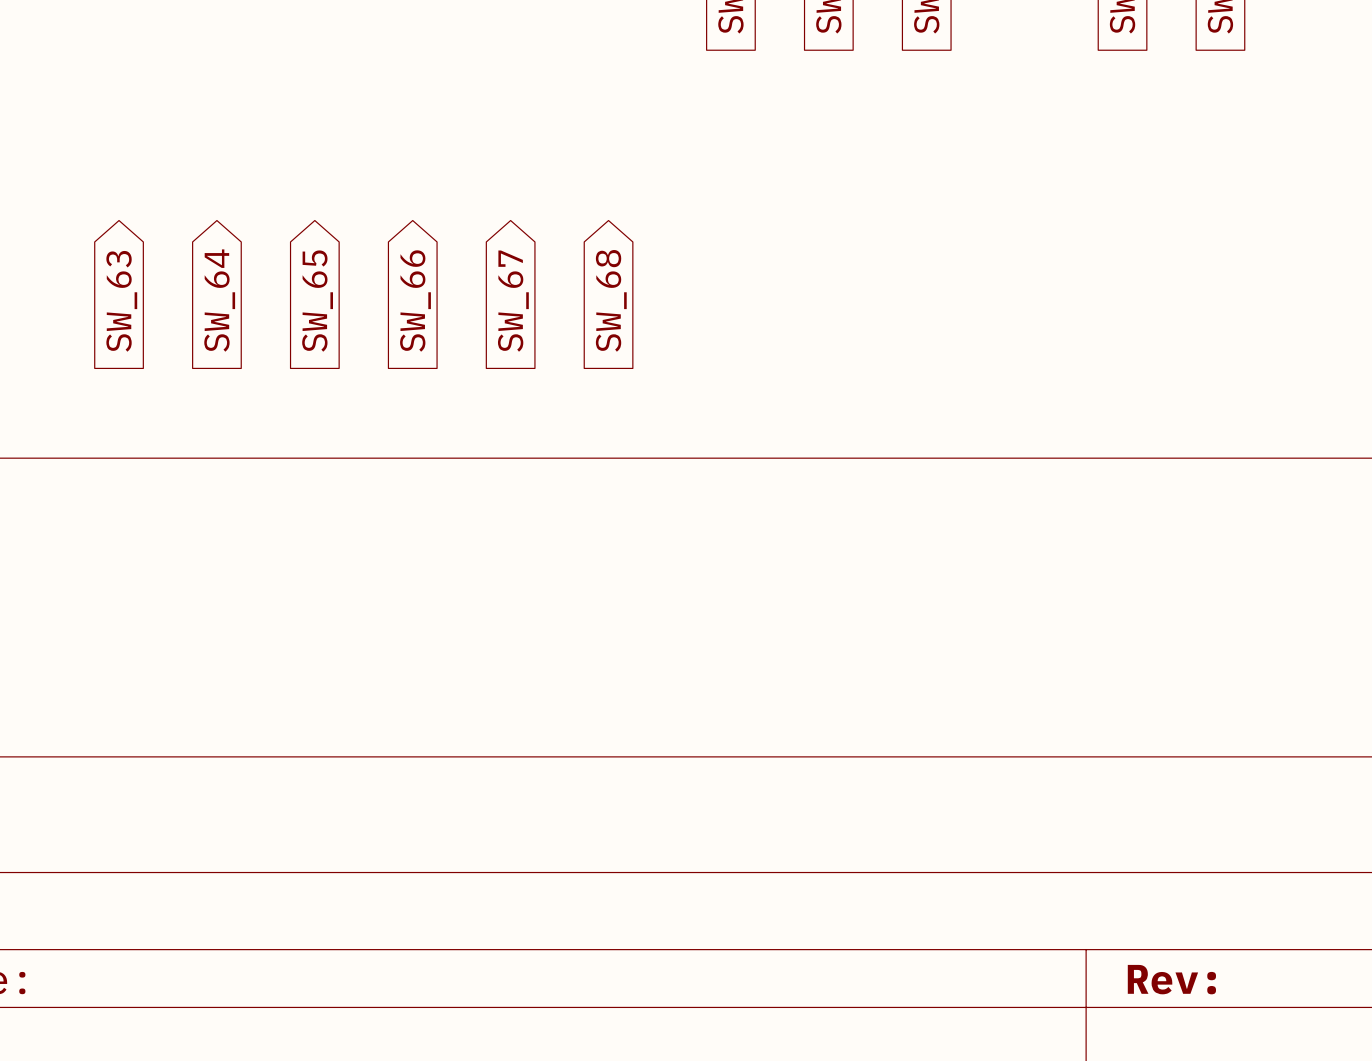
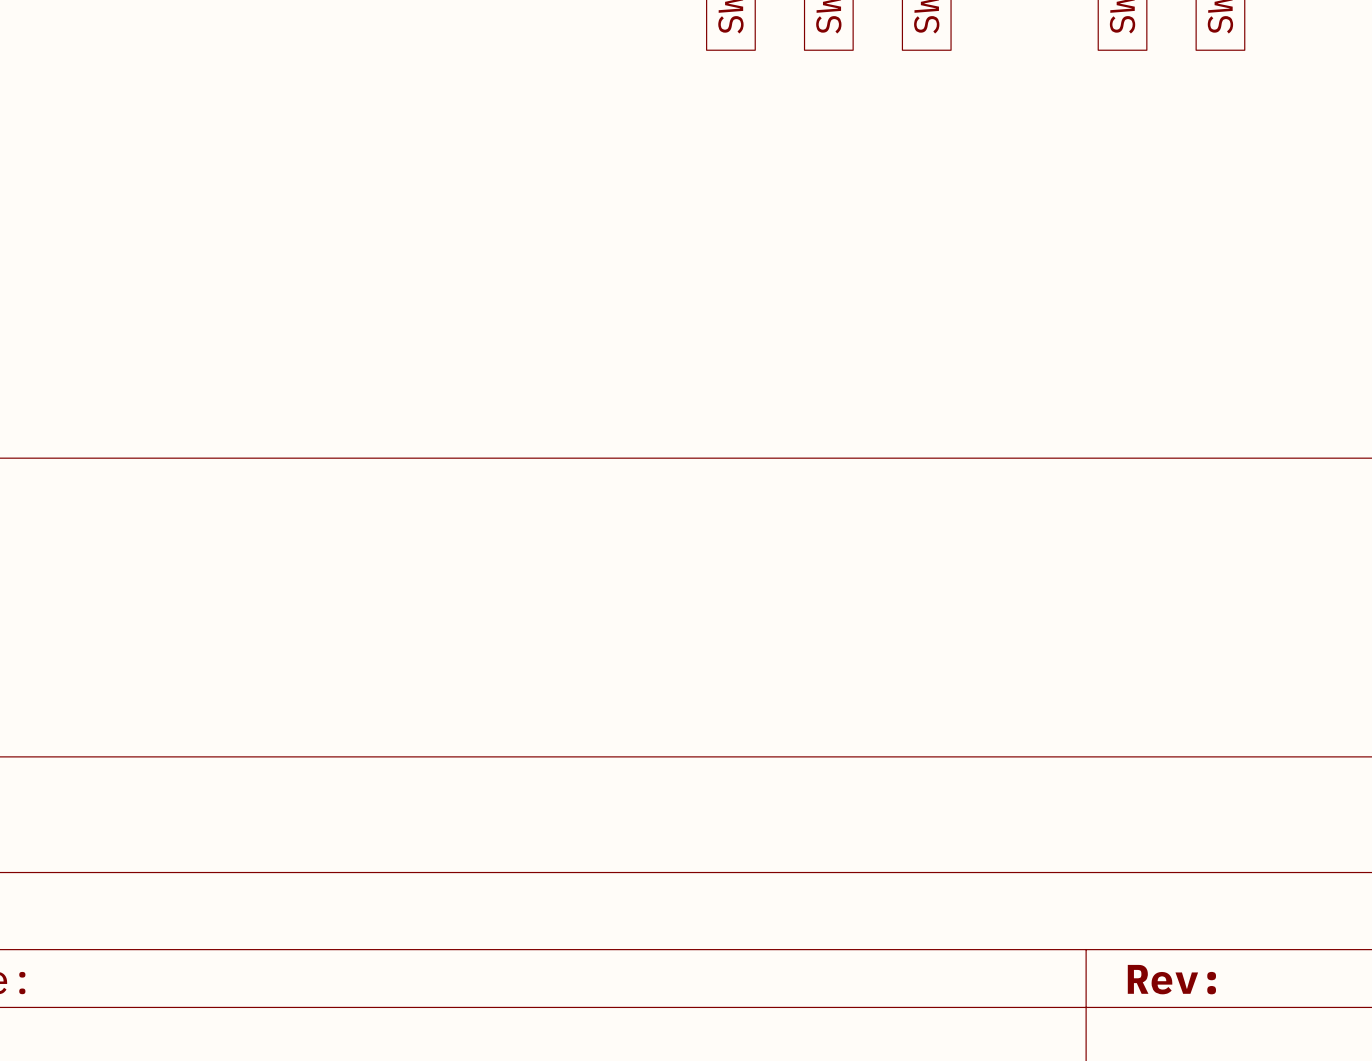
global label: SW_64 (219, 300) -> none
global label: SW_68 (611, 300) -> none
global label: SW_63 (121, 301) -> none
global label: SW_65 (317, 301) -> none
global label: SW_66 (415, 301) -> none
global label: SW_67 (513, 301) -> none

